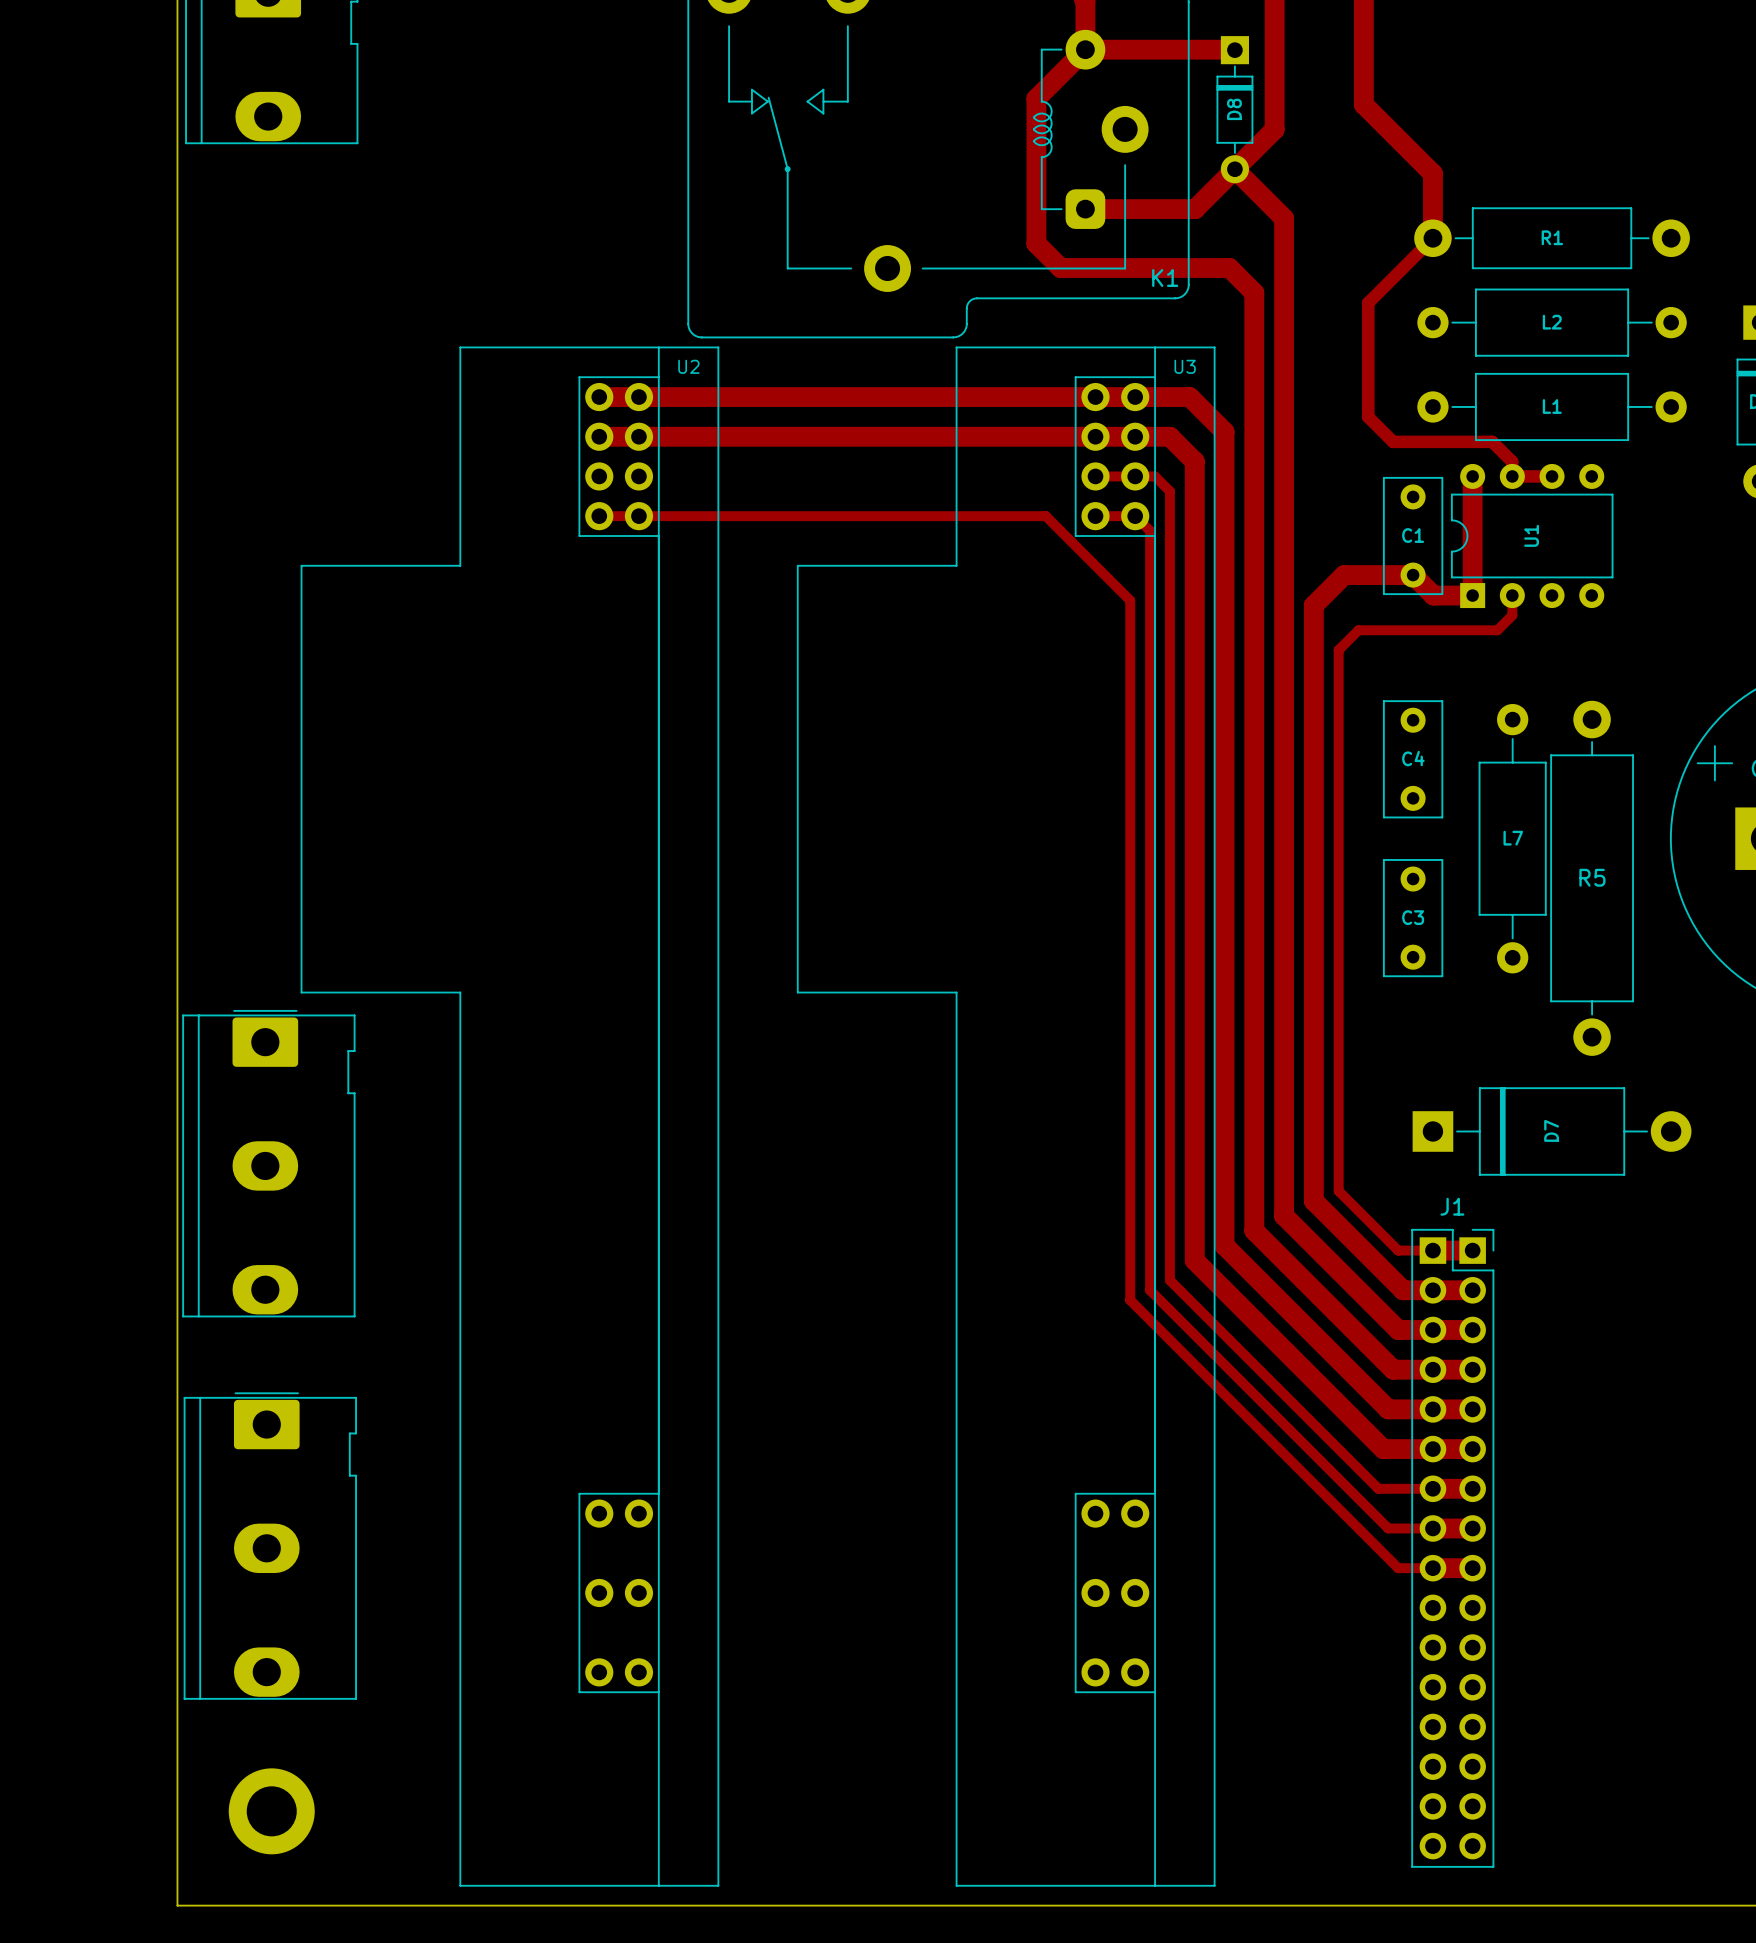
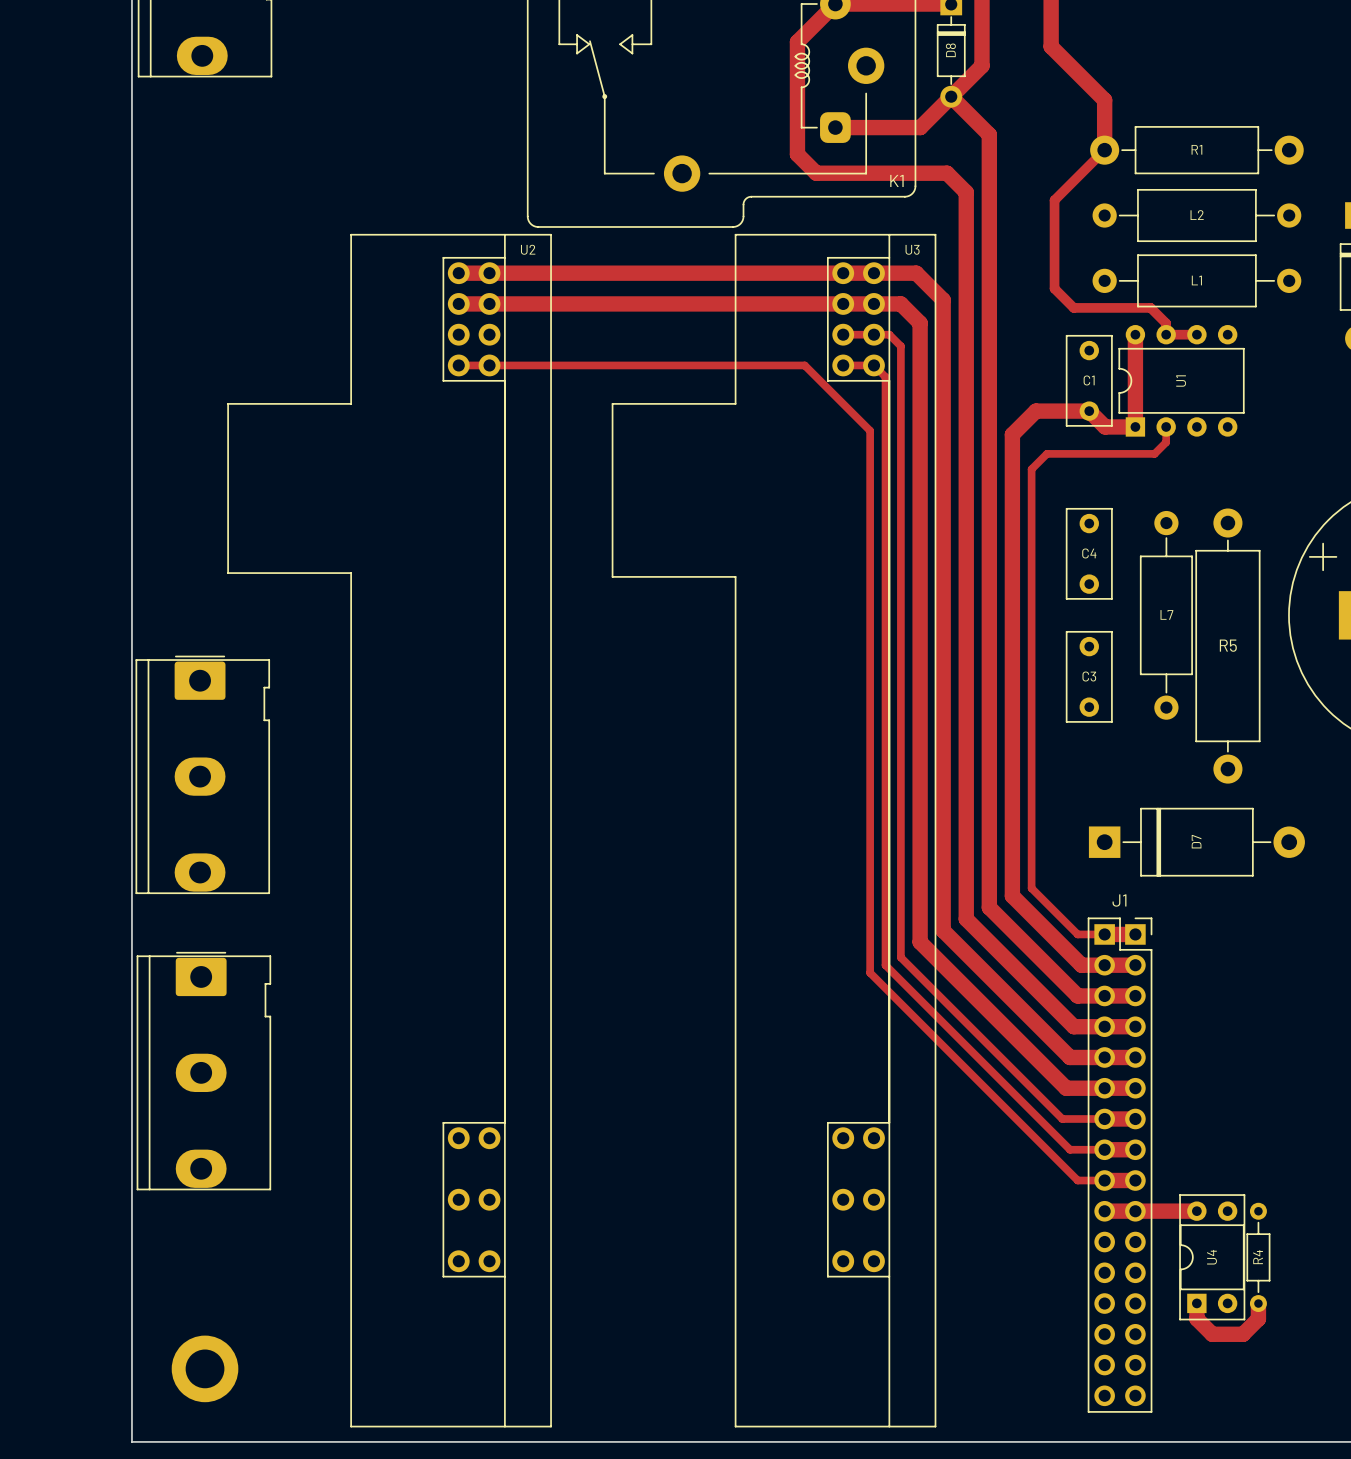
U2 footprint: [300, 346, 720, 1887] -> [227, 234, 552, 1428]
U3 footprint: [796, 346, 1216, 1887] -> [611, 234, 937, 1428]
part position: (268, 1163) -> (202, 774)
part position: (270, 1546) -> (203, 1071)
track: none -> (1104, 1211) (1196, 1211)
U4: none -> (1212, 1257)
R4: none -> (1258, 1257)
track: none -> (1196, 1303) (1196, 1318) (1212, 1334) (1243, 1334) (1258, 1318) (1258, 1303)

